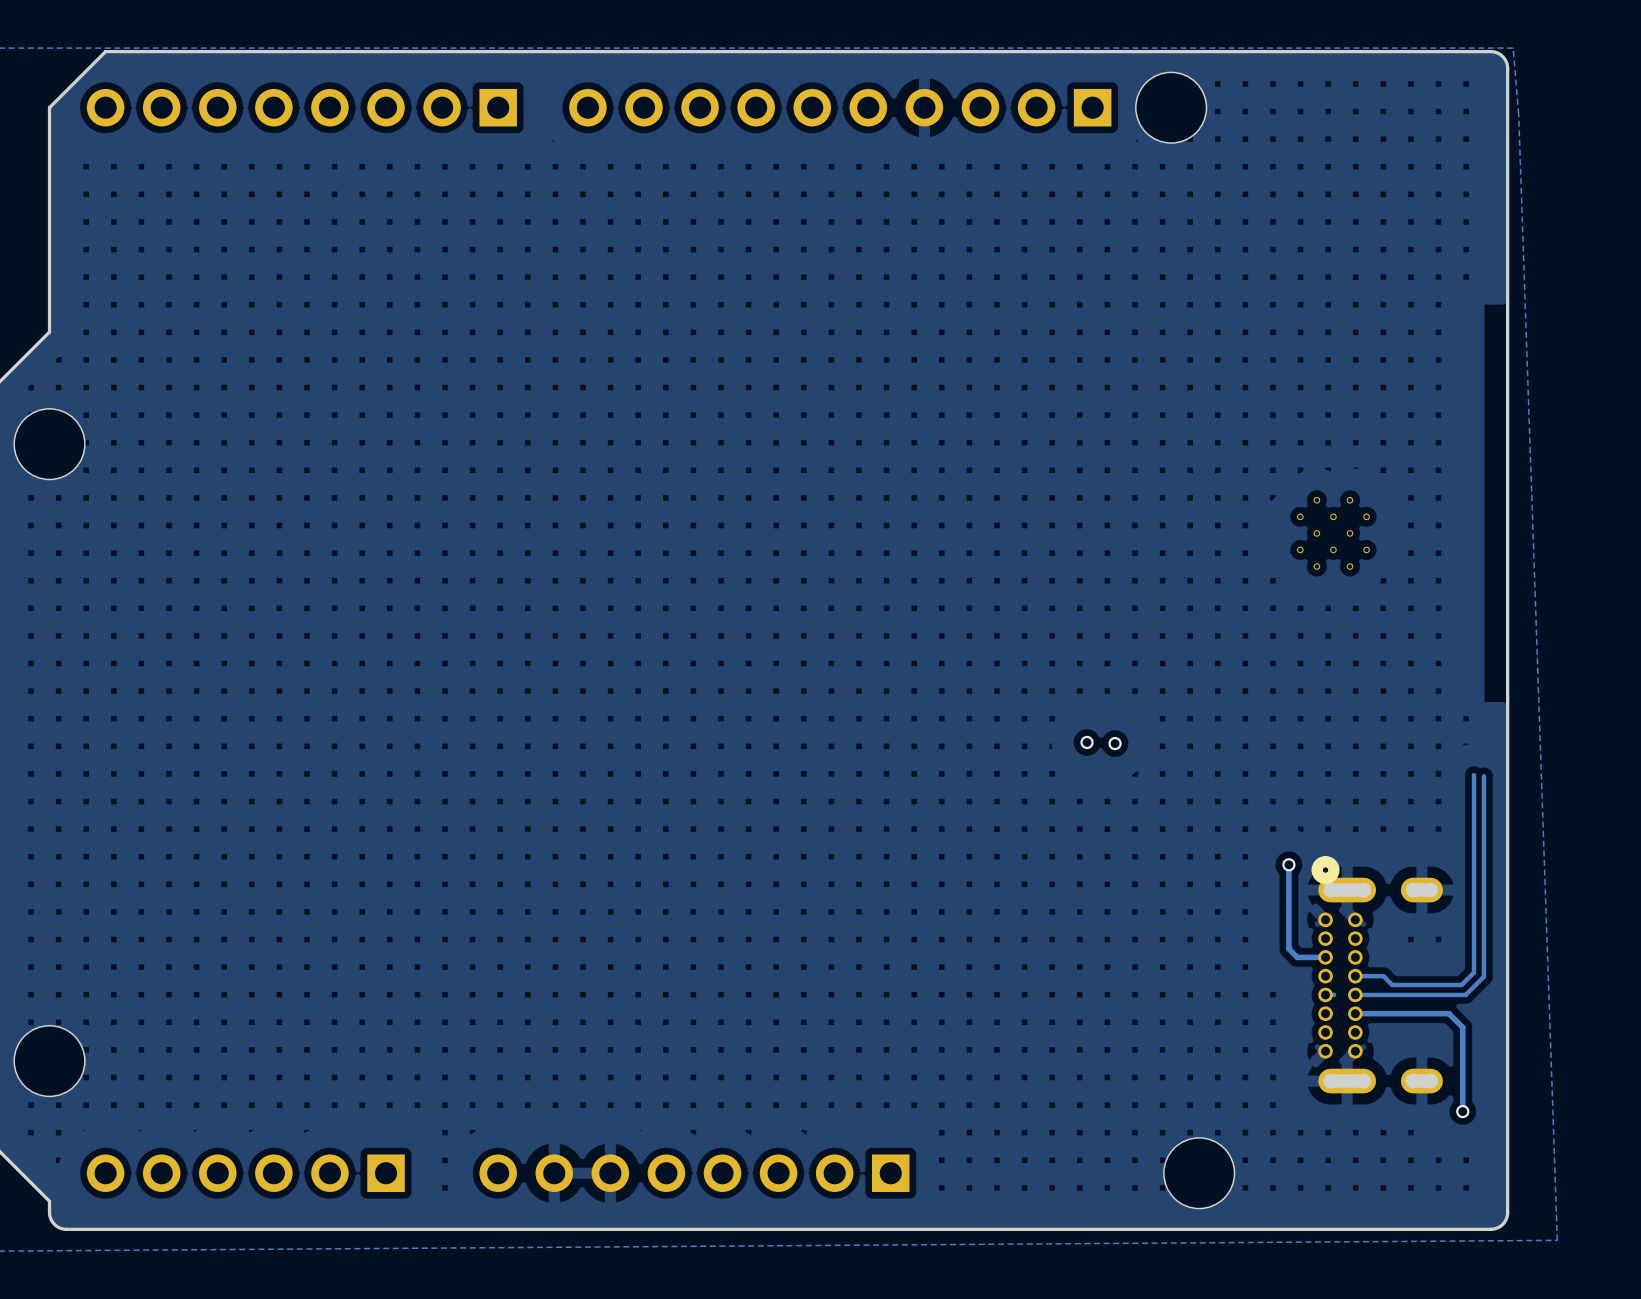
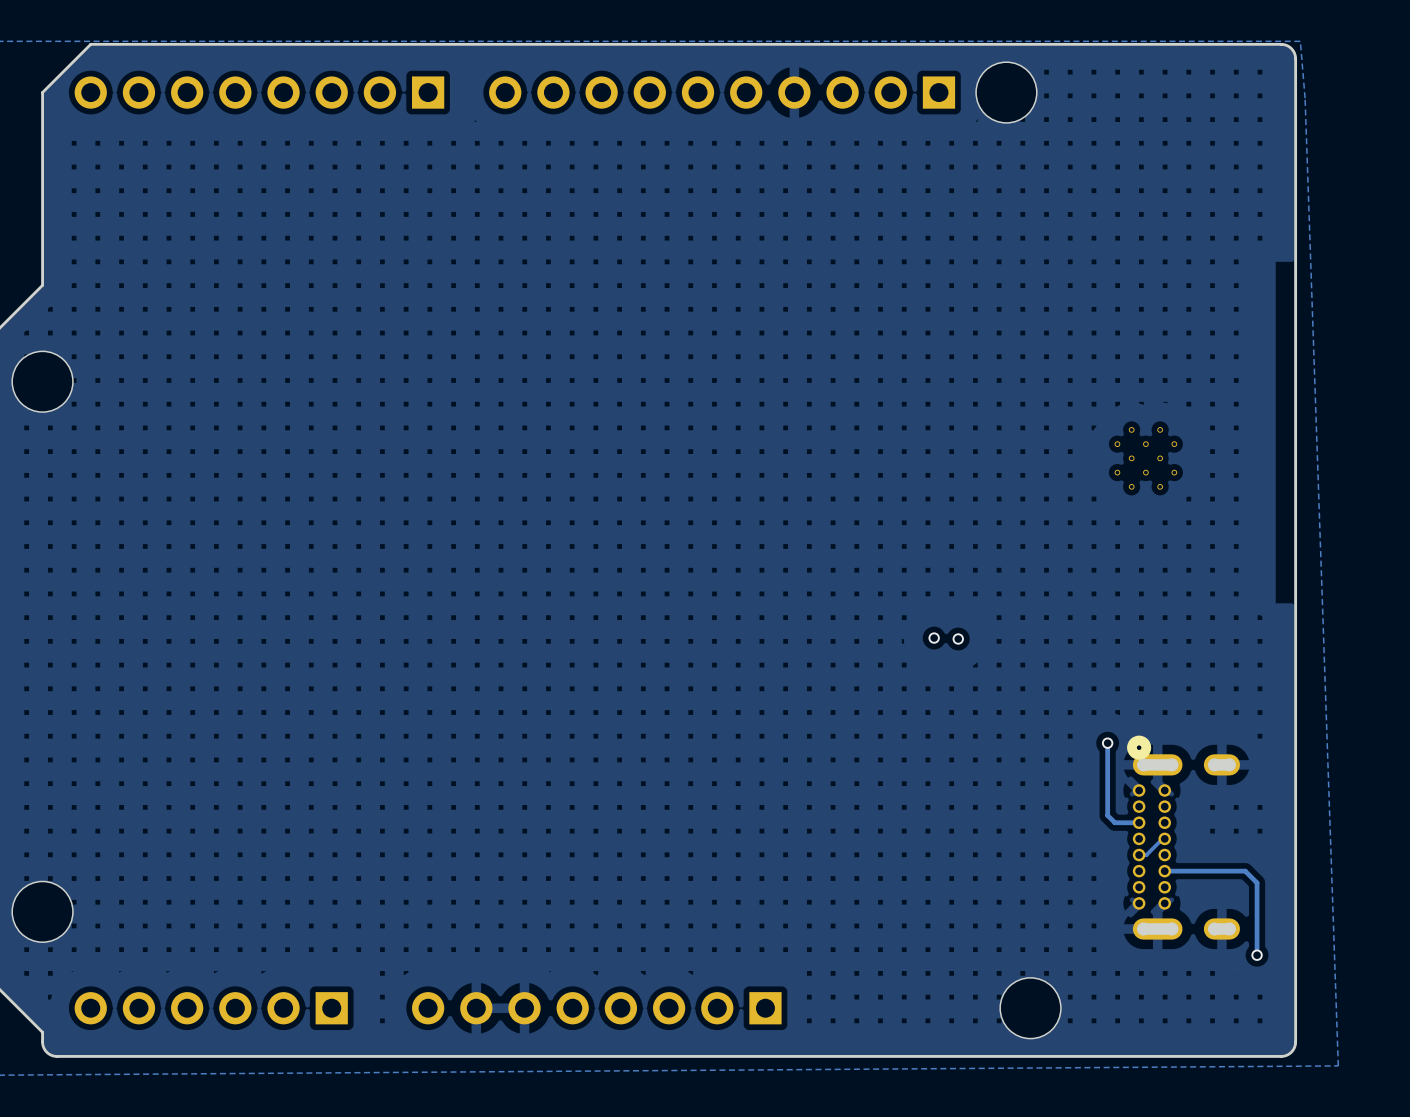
track: (1473, 775) (1473, 972) (1461, 985) (1392, 985) (1383, 976) (1355, 976) -> none
track: (1483, 776) (1483, 976) (1465, 994) (1355, 994) -> none
track: none -> (1162, 838) (1146, 855)

